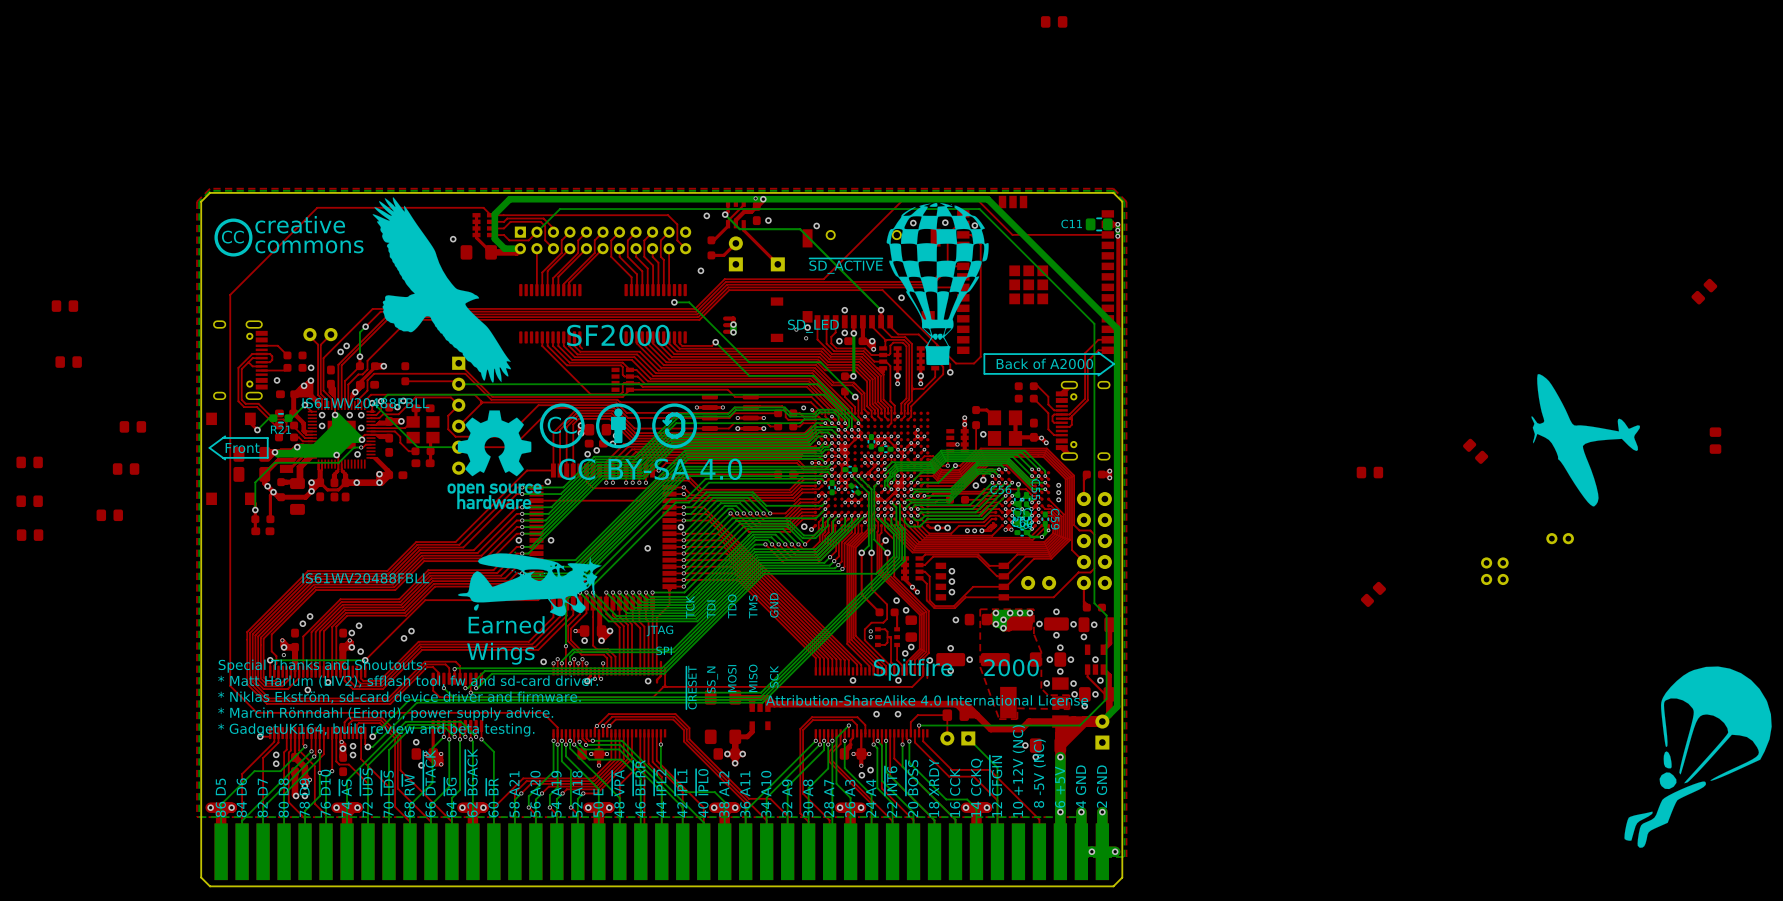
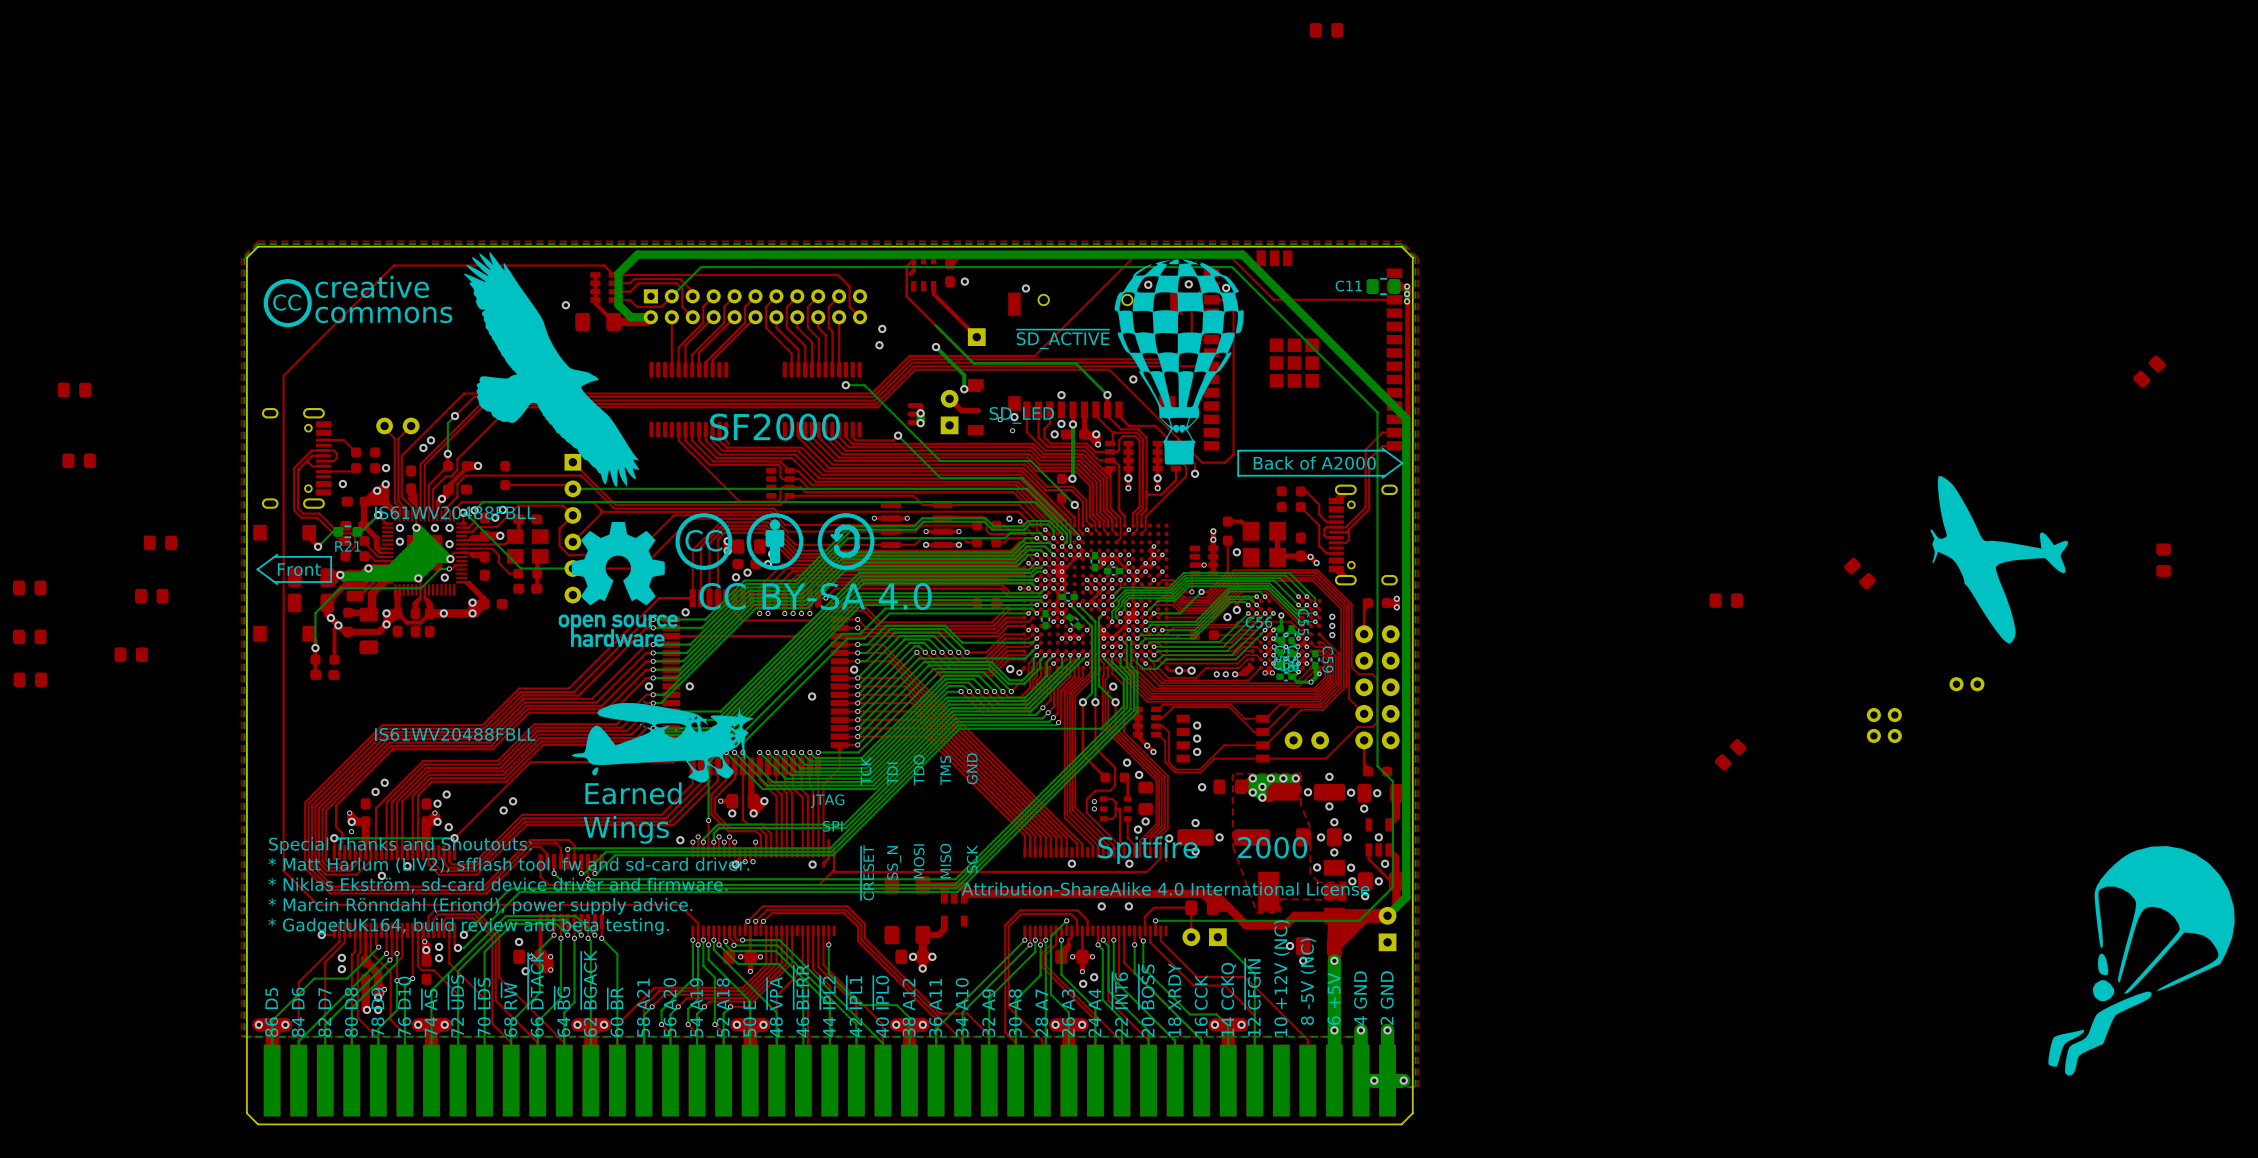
via: (755, 198) -> none
via: (763, 199) -> none
top track: none -> (914, 259) (906, 266) (906, 296) (960, 350)
top track: (743, 202) (743, 205) (728, 220) (728, 226) (713, 240) (711, 240) -> none
top track: (756, 206) (751, 211) (744, 211) (735, 220) (735, 224) -> none
bottom track: (725, 214) (739, 229) (800, 229) (856, 285) -> (935, 325) (973, 363) (1075, 363)
via: (725, 214) -> none
via: (706, 215) -> none
top track: (735, 243) (723, 255) (711, 255) -> none
part: (711, 247) -> none
part position: (735, 253) -> (949, 412)
via: none -> (882, 328)
bottom track: none -> (936, 347) (964, 375) (964, 389)
via: none -> (936, 347)
via: none -> (964, 389)
top track: none -> (978, 389) (964, 389)
top track: none -> (949, 398) (961, 410) (978, 410)

